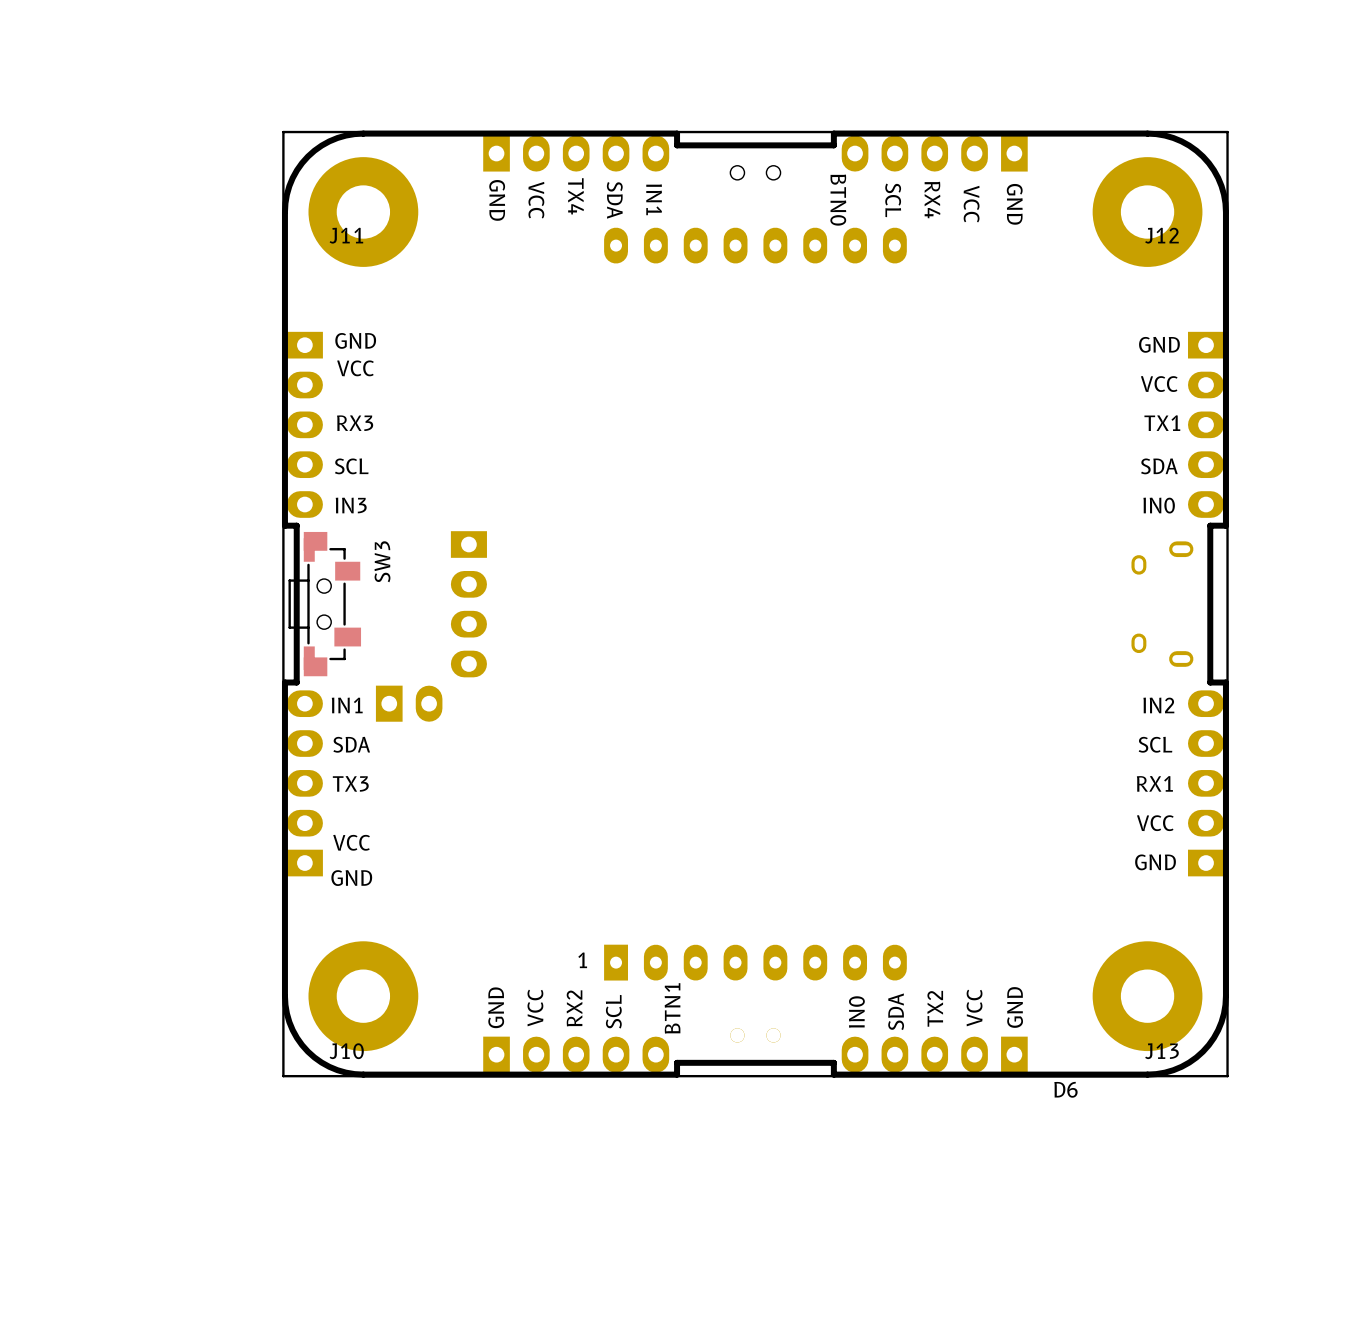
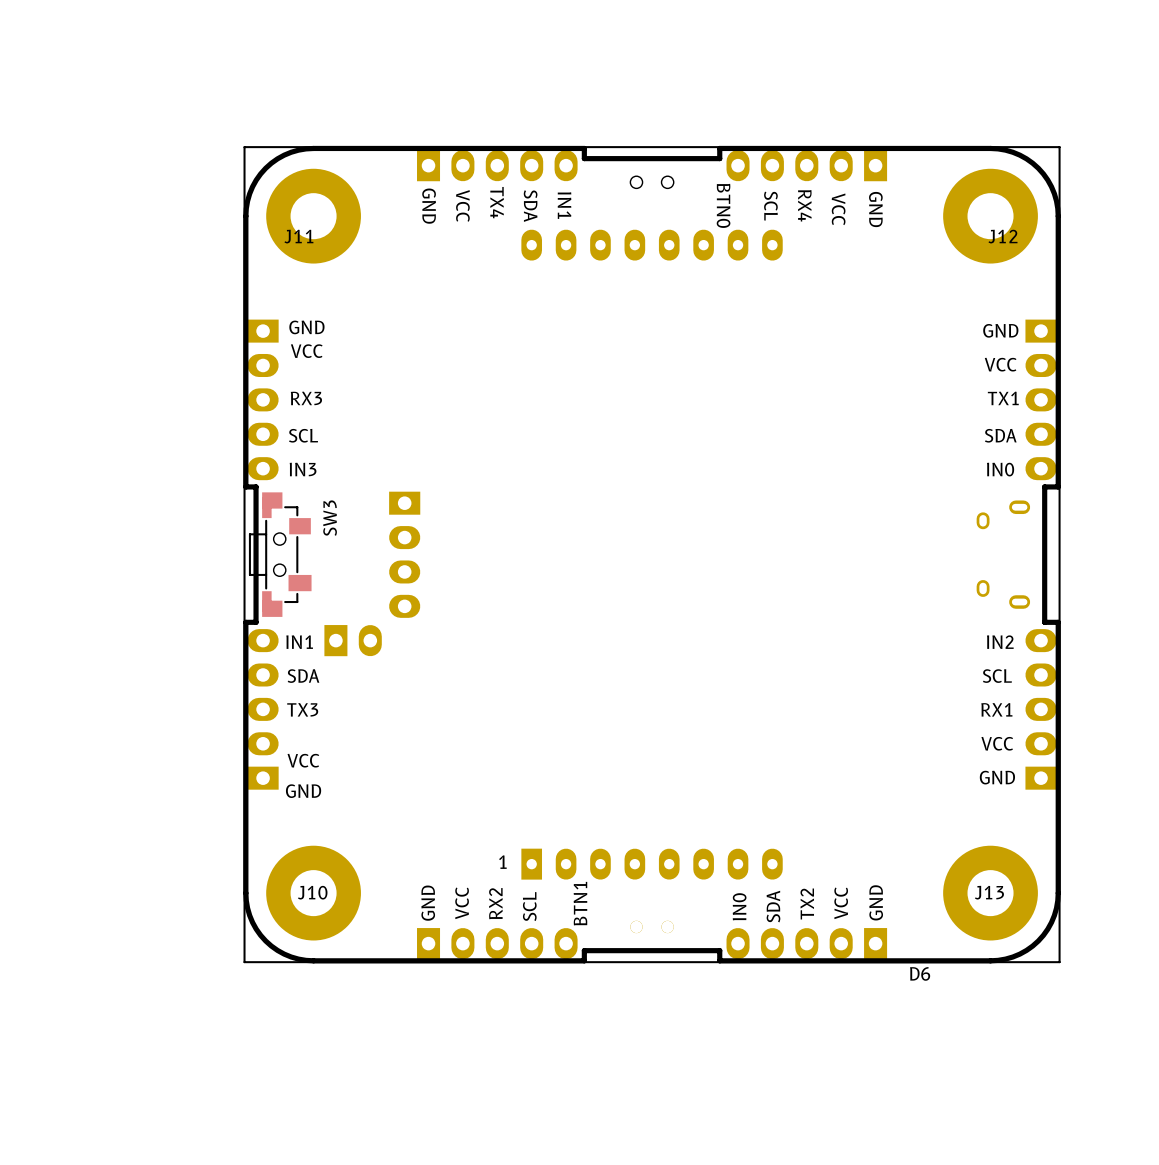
J10 name position: J10 (346, 1051) -> J10 (312, 892)
J13 name position: J13 (1161, 1051) -> J13 (989, 892)

